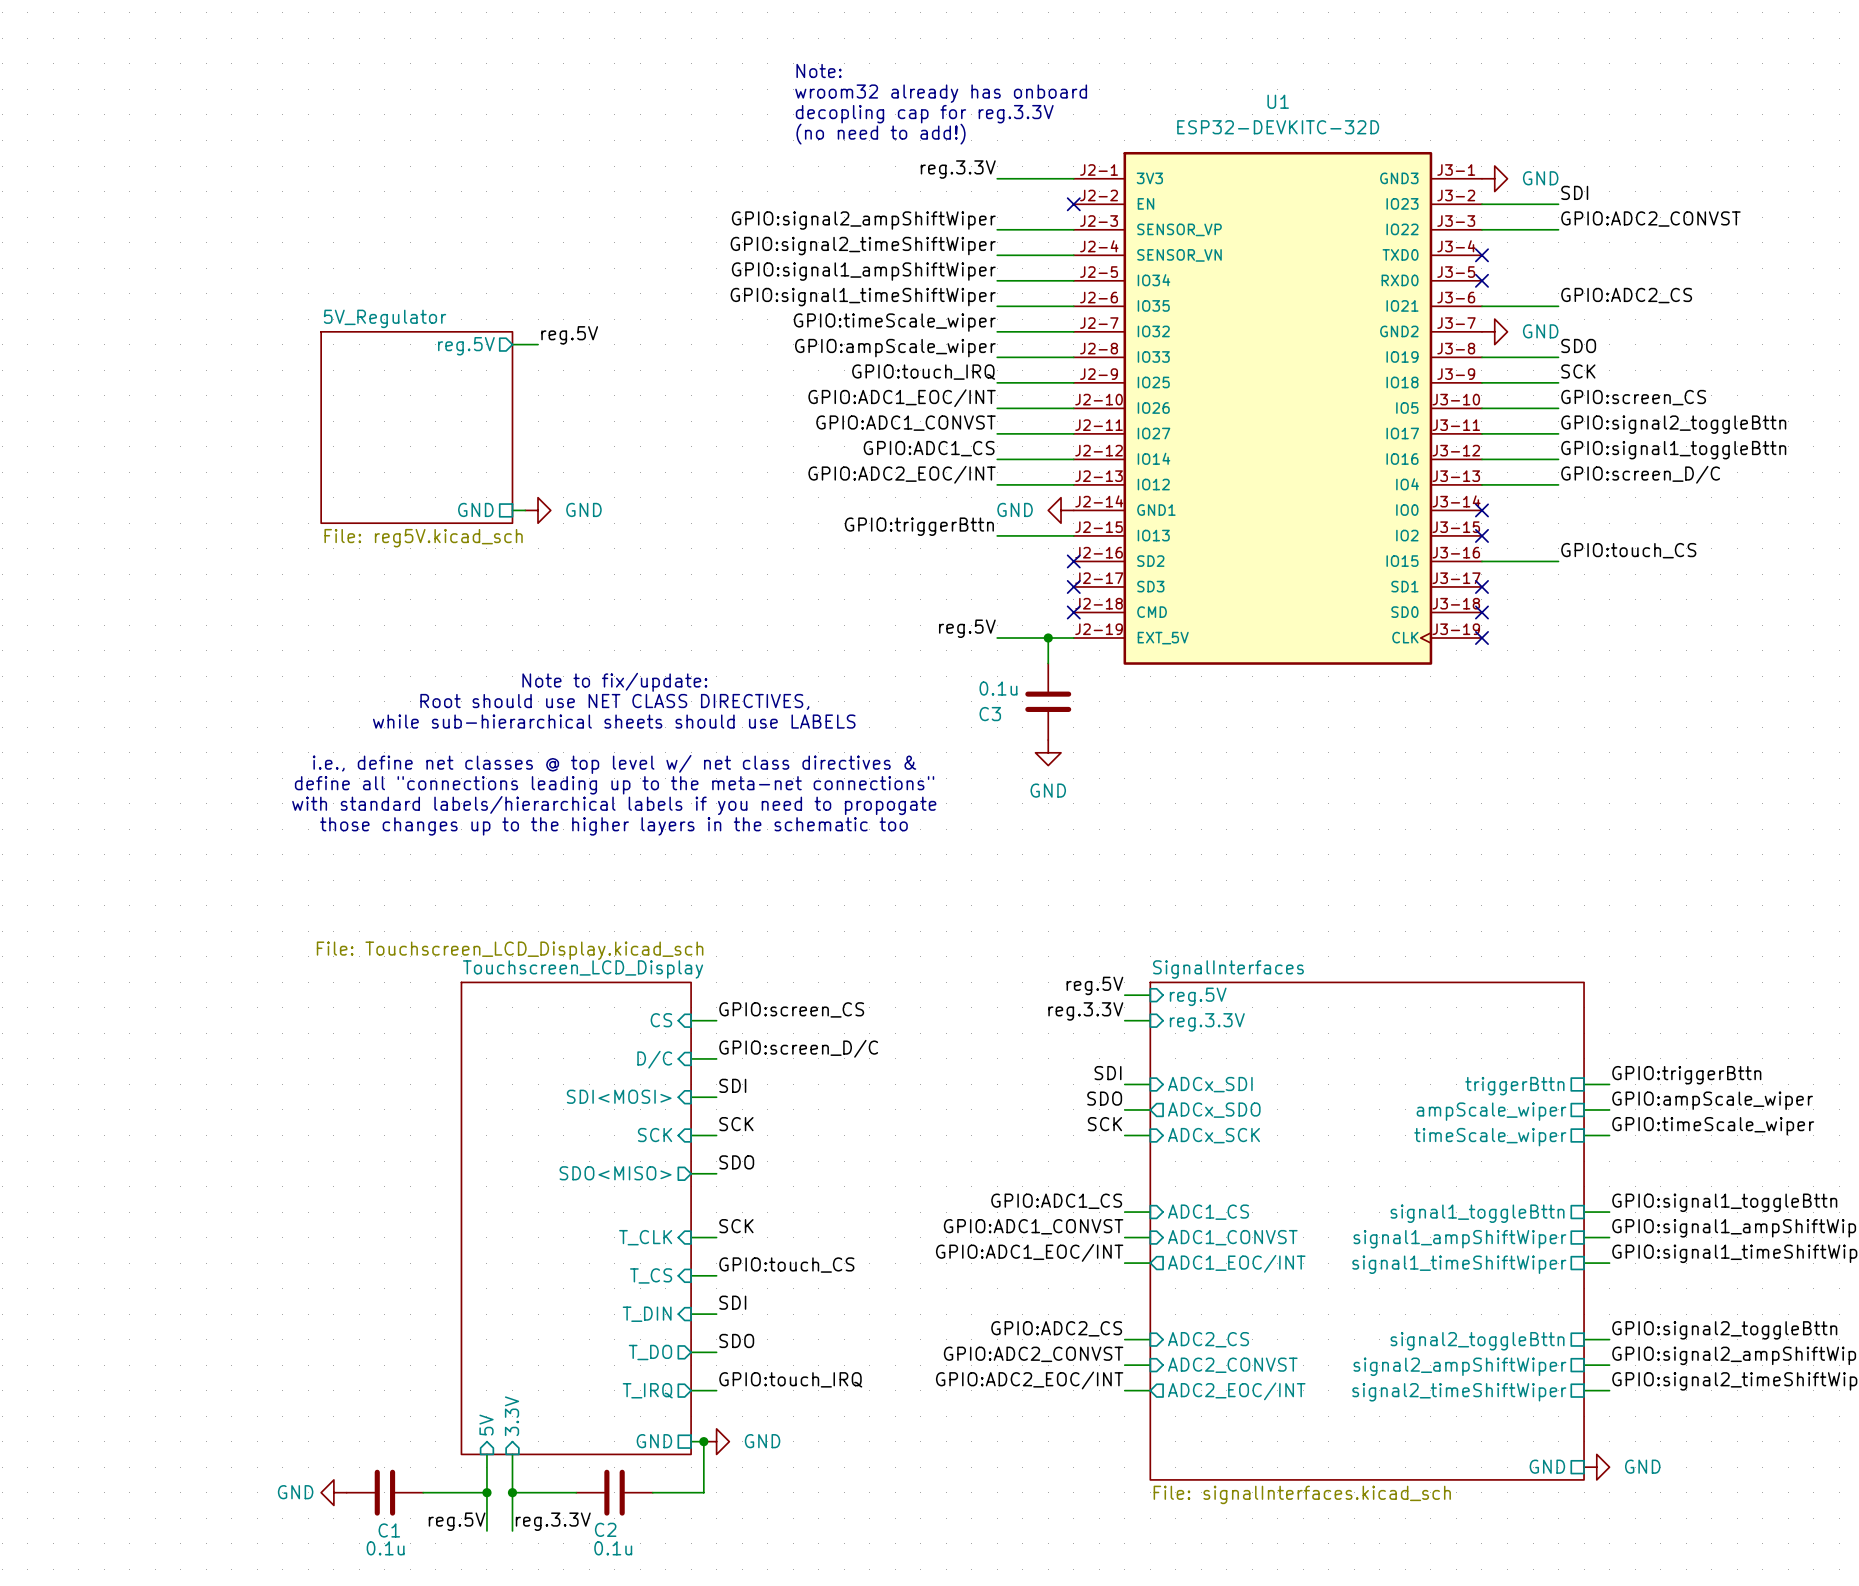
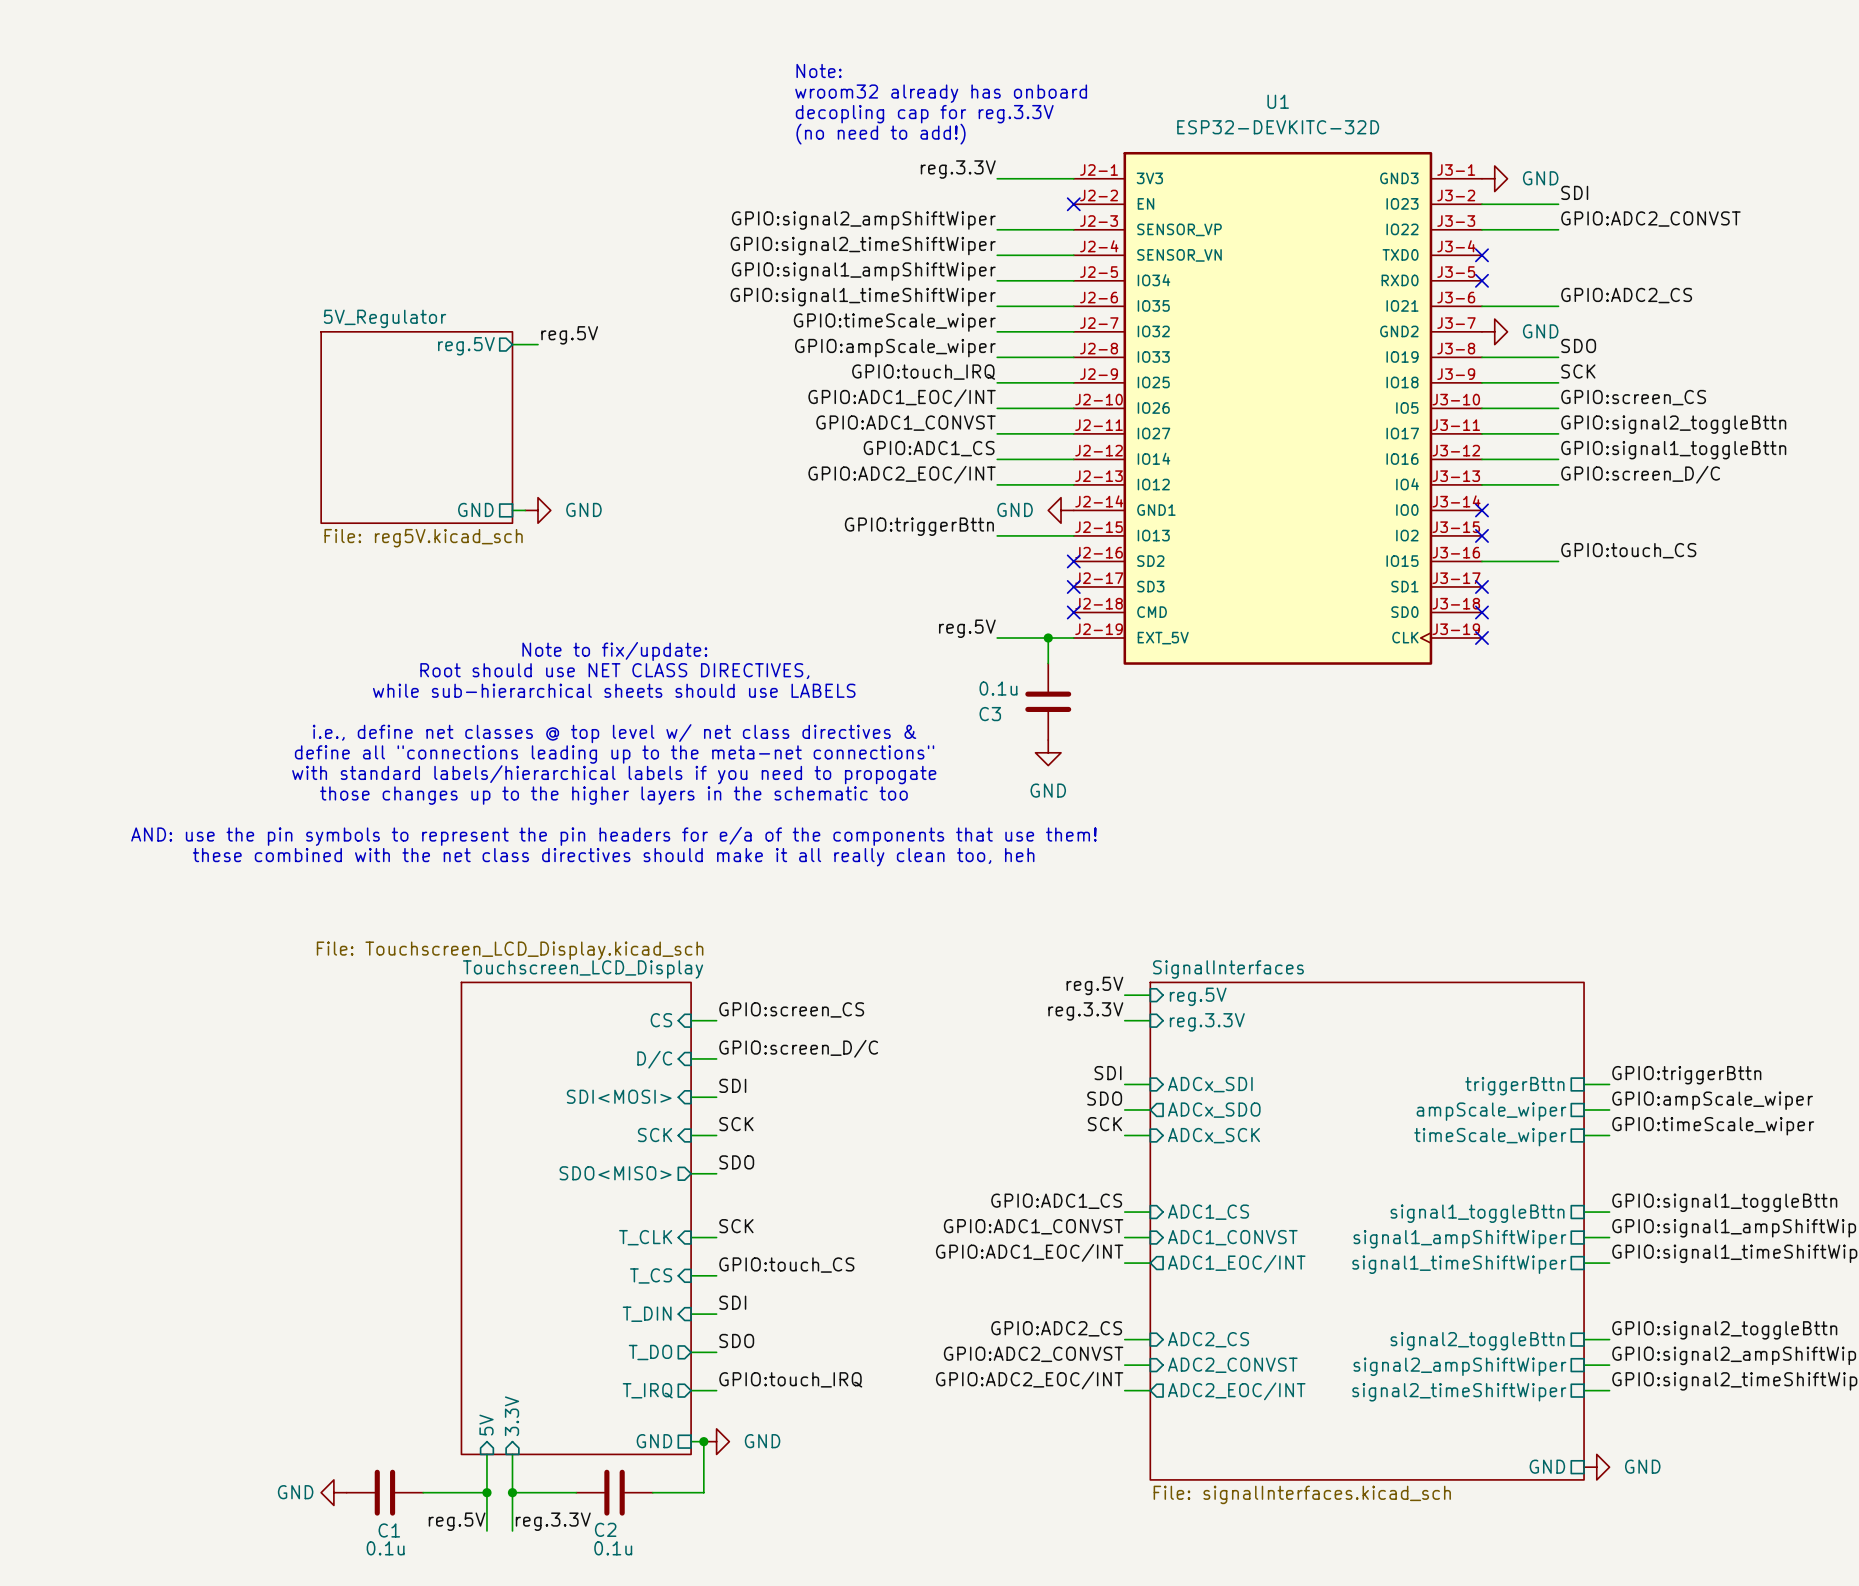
text position: Note to fix/update: (614, 682) -> Note to fix/update: (614, 651)
text position: Root should use NET CLASS DIRECTIVES, (614, 701) -> Root should use NET CLASS DIRECTIVES, (614, 671)
text position: while sub-hierarchical sheets should use LABELS (614, 721) -> while sub-hierarchical sheets should use LABELS (614, 690)
text position: i.e., define net classes @ top level w/ net class directives & (614, 764) -> i.e., define net classes @ top level w/ net class directives & (614, 733)
text position: define all "connections leading up to the meta-net connections" (614, 785) -> define all "connections leading up to the meta-net connections" (614, 754)
text position: with standard labels/hierarchical labels if you need to propogate (614, 805) -> with standard labels/hierarchical labels if you need to propogate (614, 774)
text position: those changes up to the higher layers in the schematic too (613, 826) -> those changes up to the higher layers in the schematic too (613, 795)
text: none -> AND: use the pin symbols to represent the pin headers for e/a of the components that use them! (613, 836)
text: none -> these combined with the net class directives should make it all really clean too, heh (613, 857)

